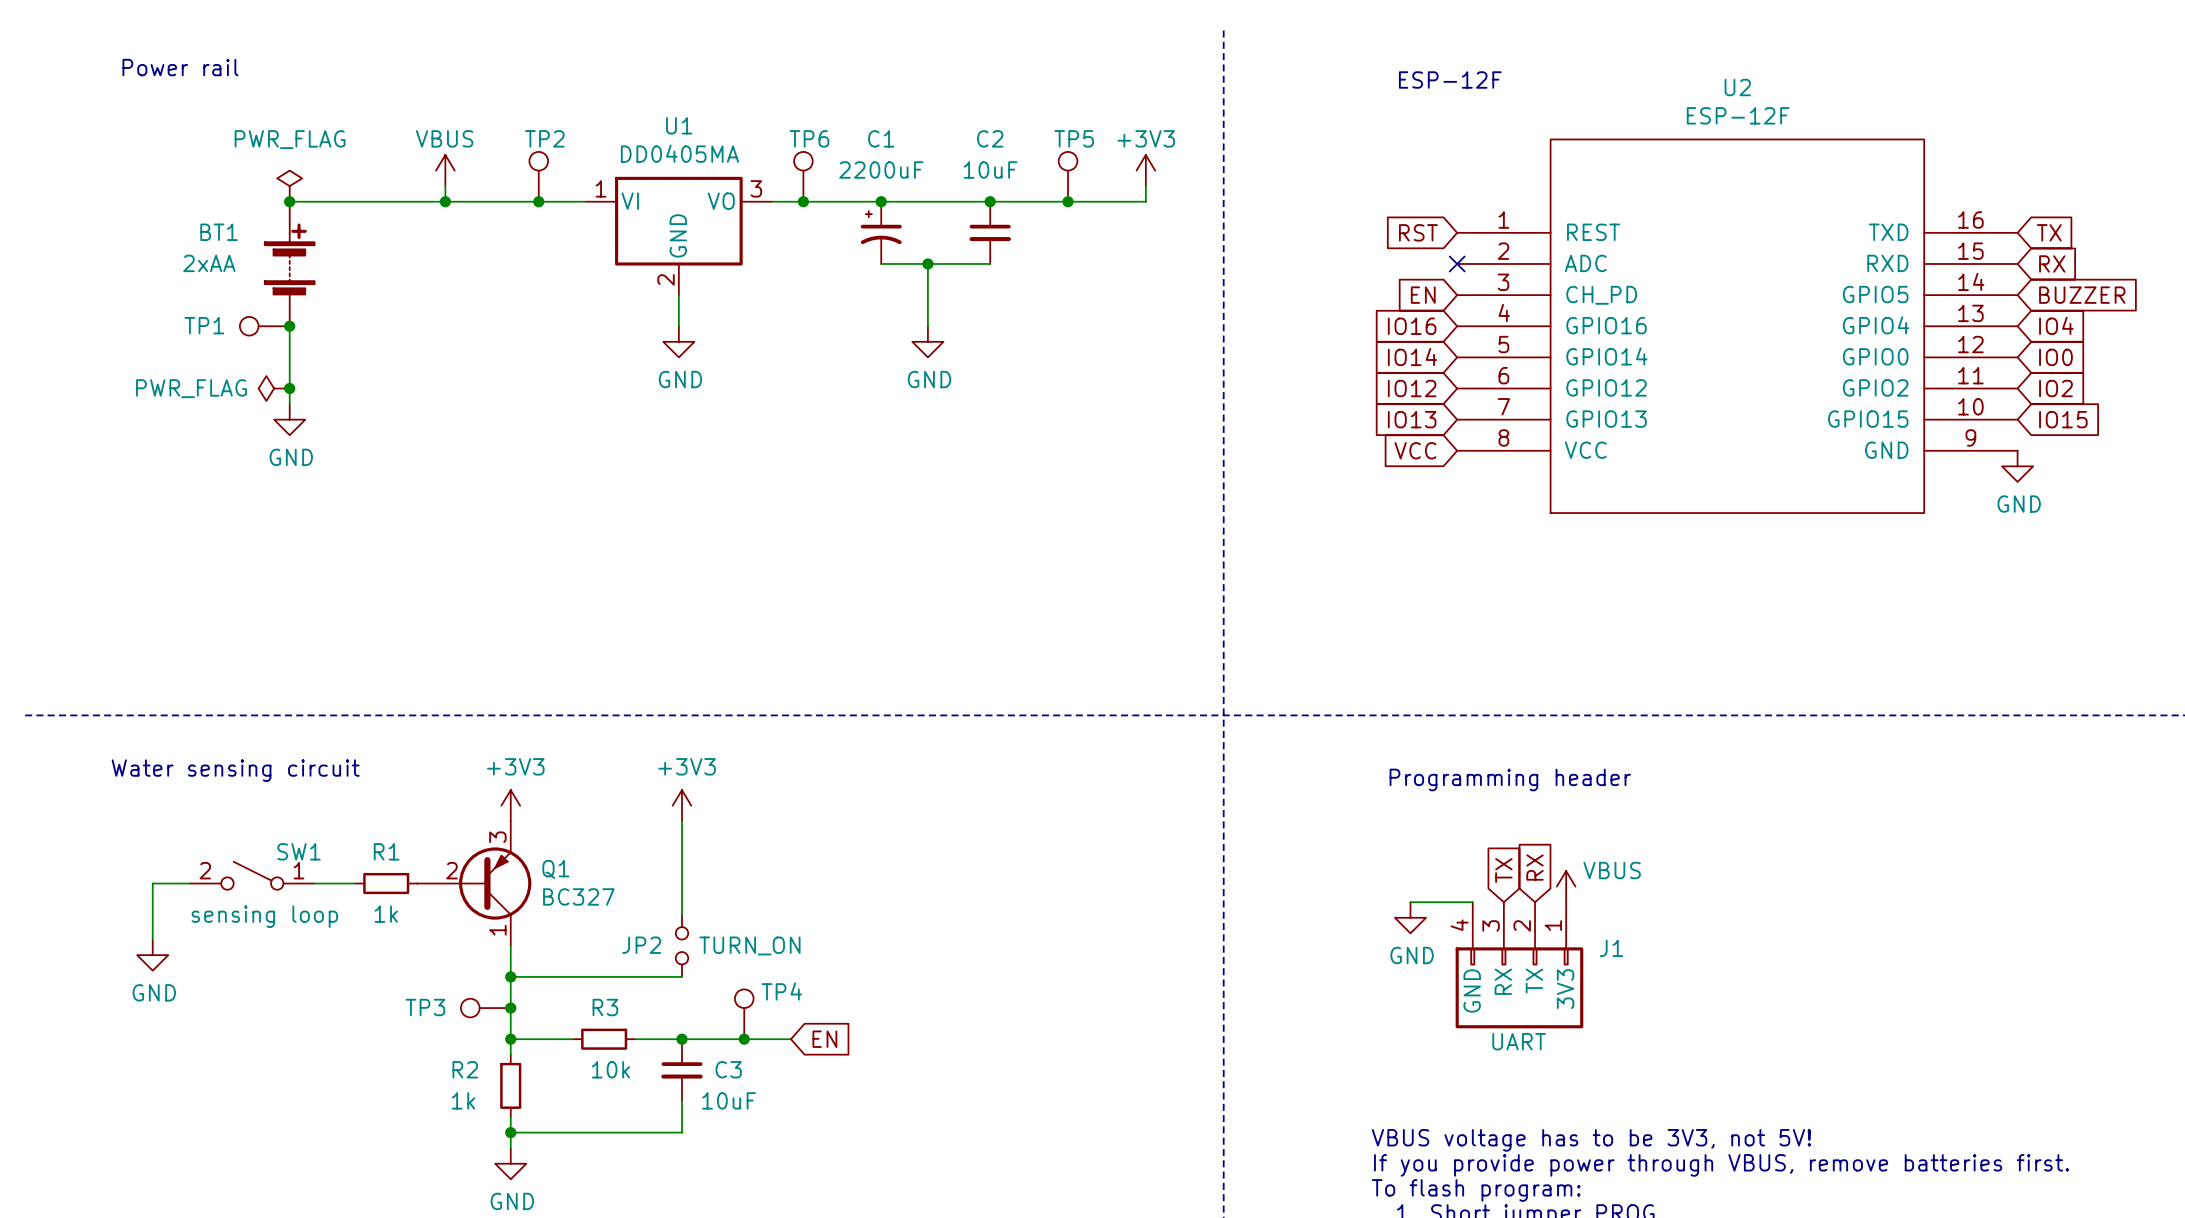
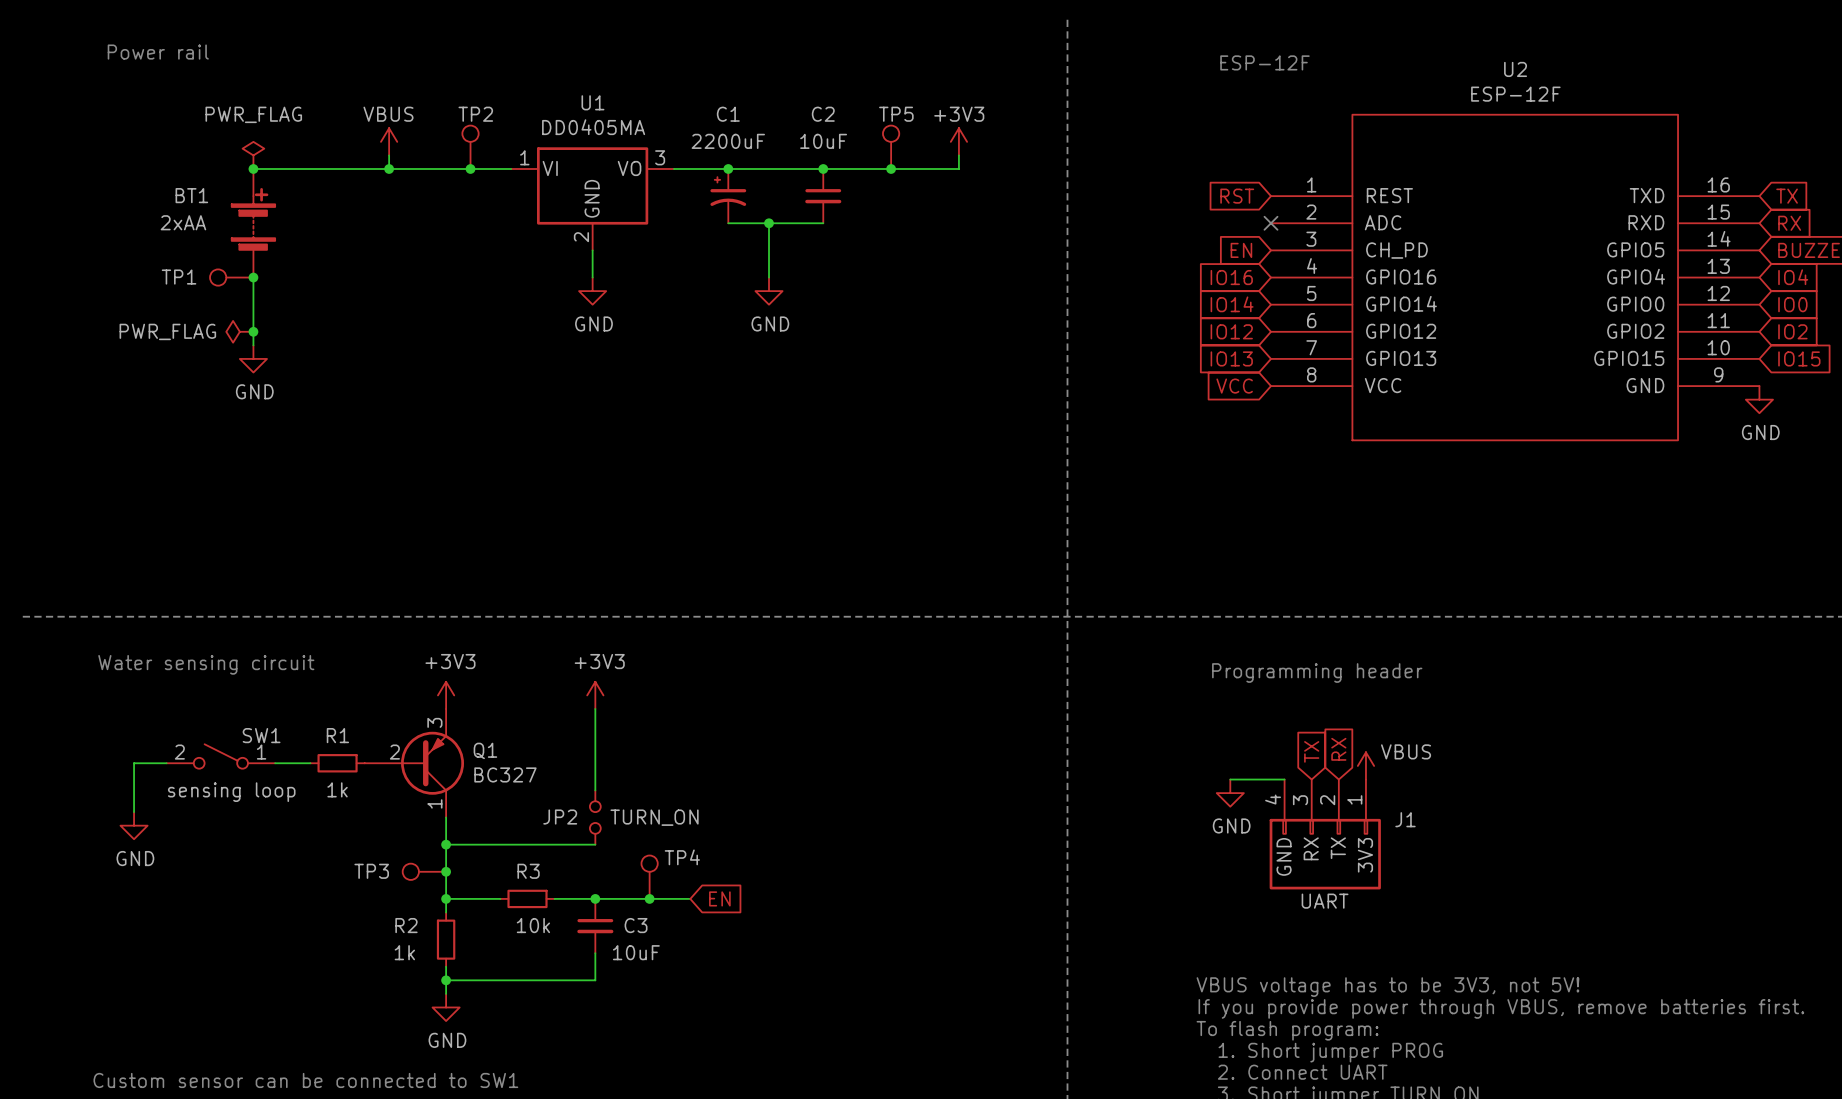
power symbol position: +3V3 (1145, 170) -> +3V3 (958, 141)
TP6: (803, 176) -> none
TP5 position: (1068, 176) -> (891, 147)
wire: (1145, 186) (1145, 201) (1099, 201) -> (958, 155) (958, 168)
junction: (803, 201) -> none
junction: none -> (728, 168)
junction: (881, 201) -> none
junction: none -> (823, 168)
junction: (990, 201) -> none
junction: none -> (891, 168)
junction: (1068, 201) -> none
C1 position: (881, 232) -> (728, 196)
C2 position: (990, 232) -> (823, 196)
wire: none -> (728, 223) (769, 223) (769, 277)
junction: none -> (769, 223)
wire: (927, 263) (927, 326) -> none
junction: (927, 263) -> none
wire: (943, 263) (990, 263) -> none
power symbol position: GND (927, 341) -> GND (769, 291)

